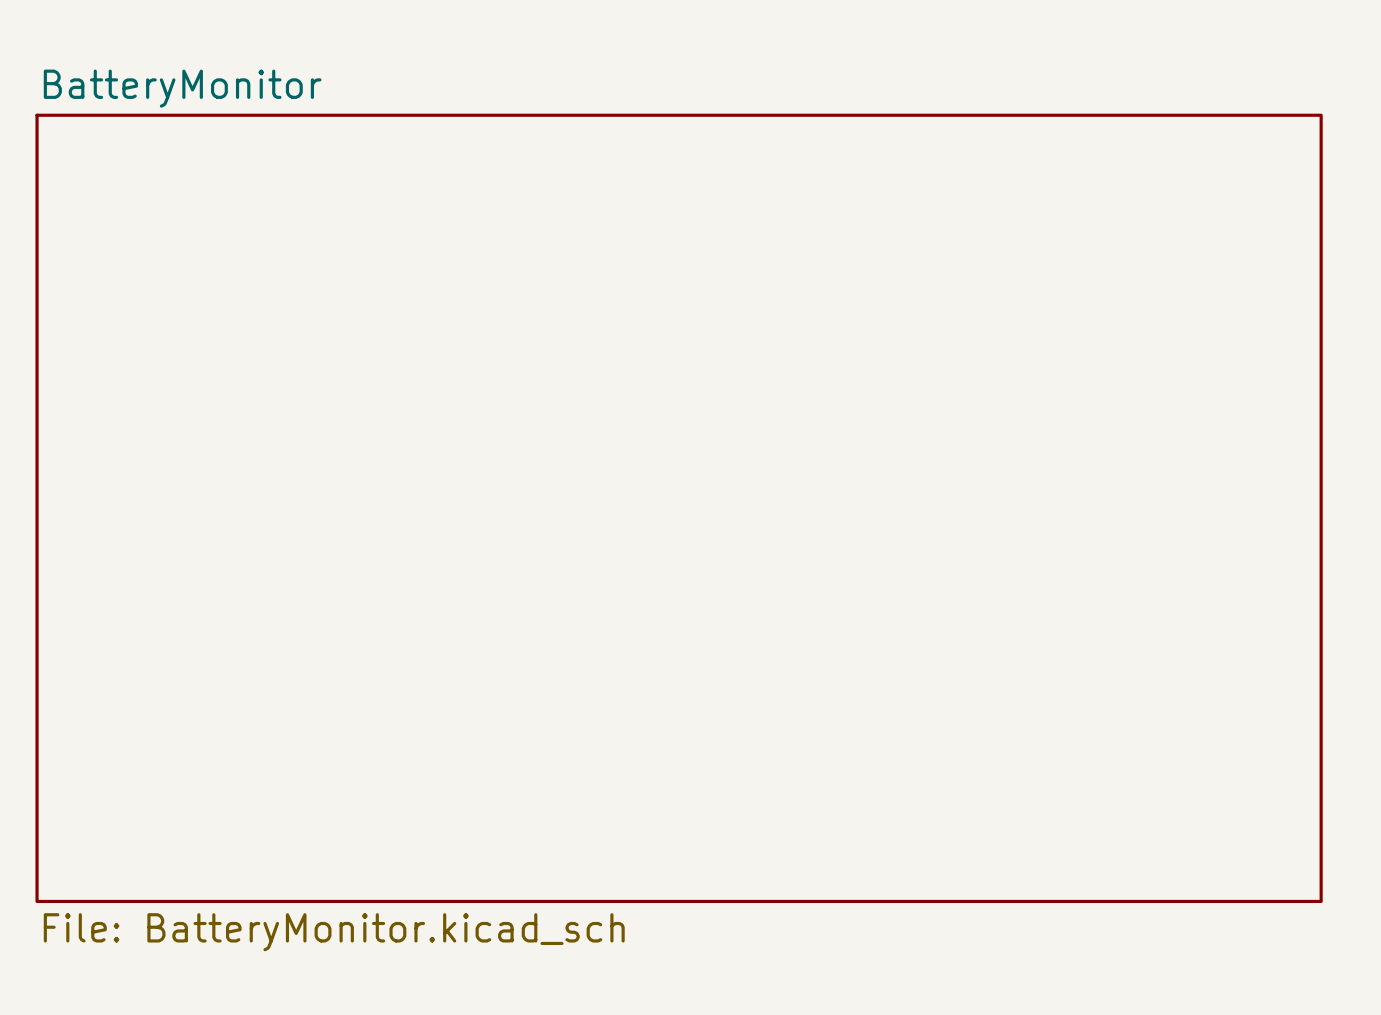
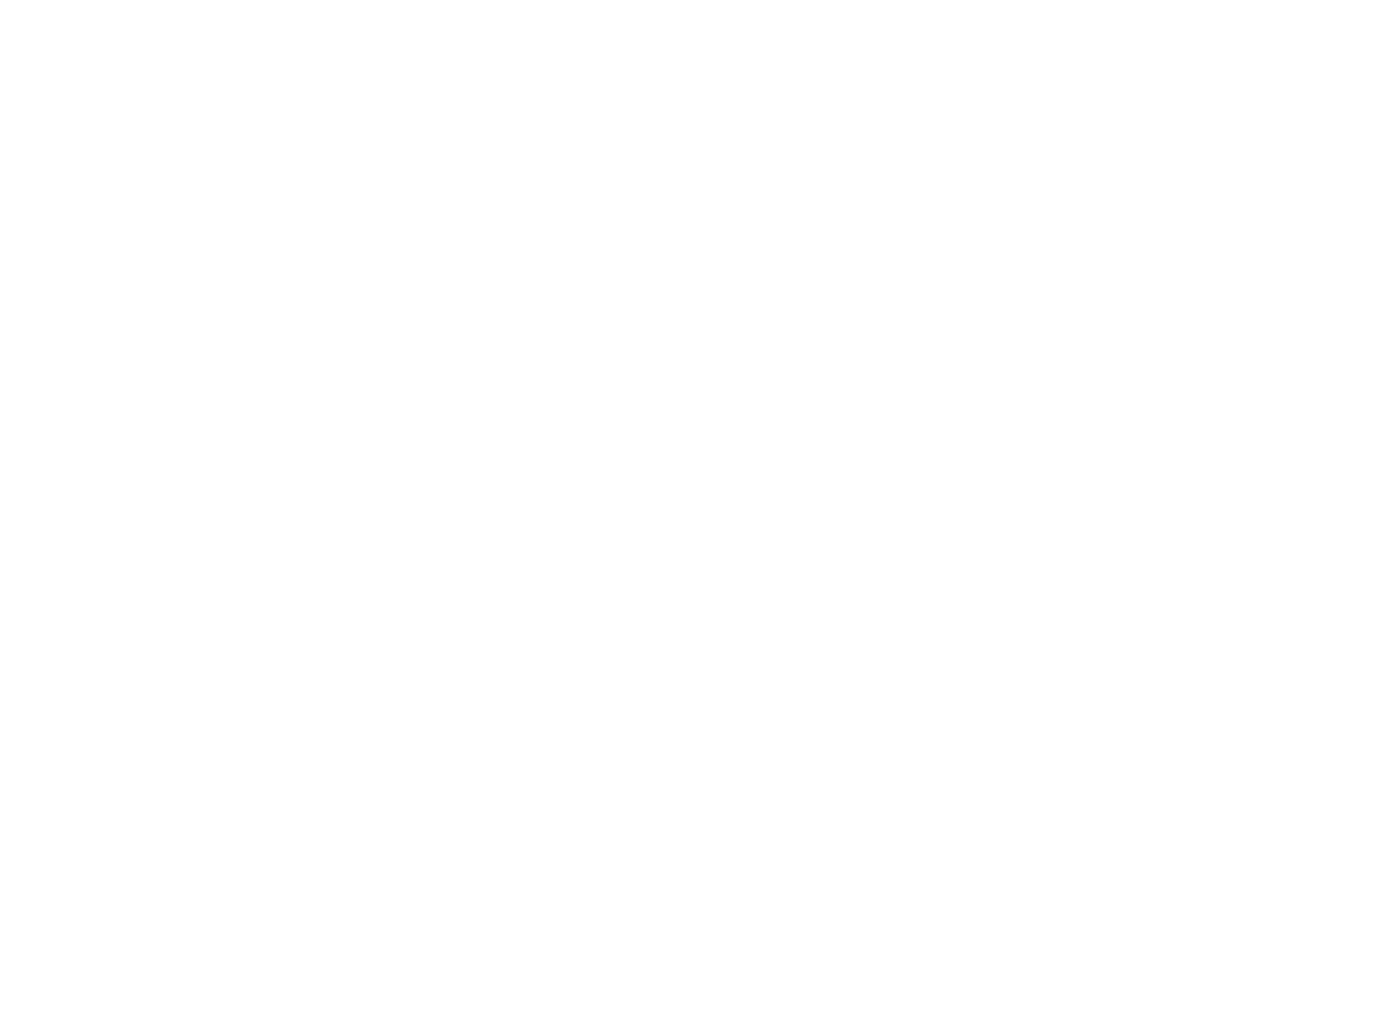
sheet BatteryMonitor: File: BatteryMonitor.kicad_sch (679, 508) -> none

